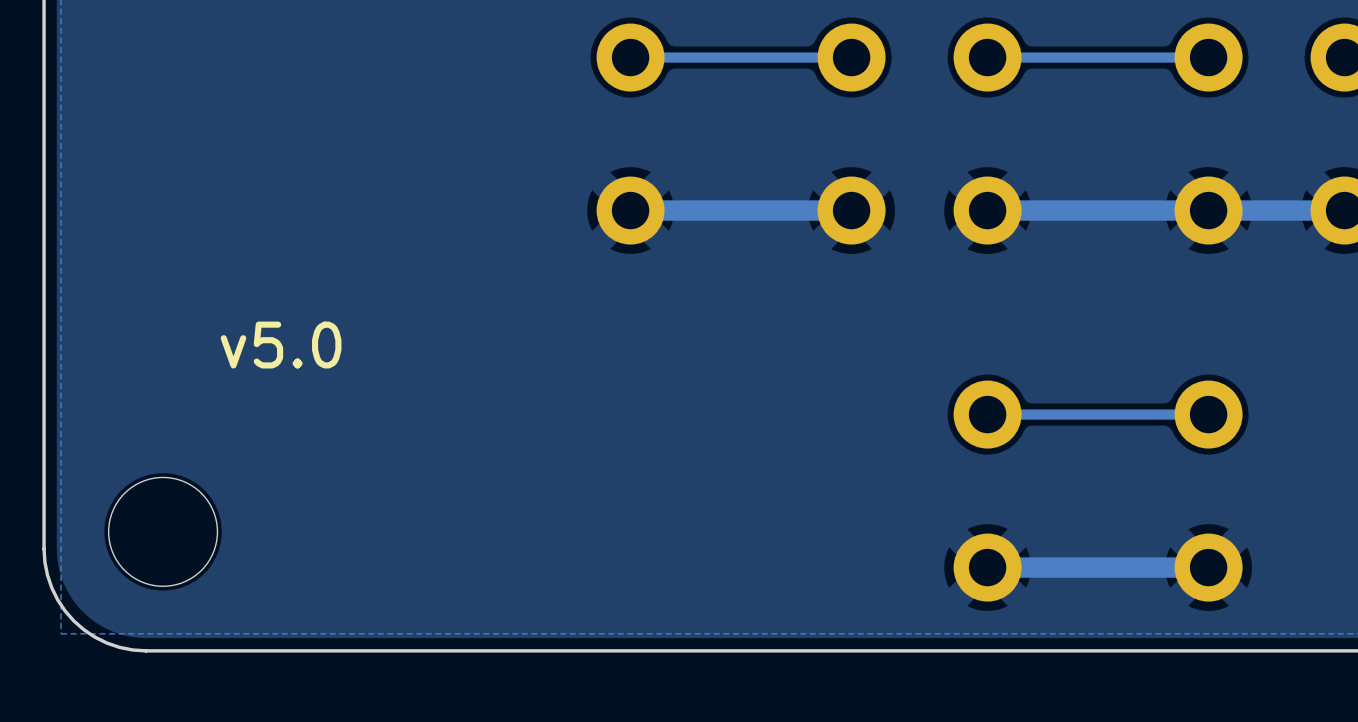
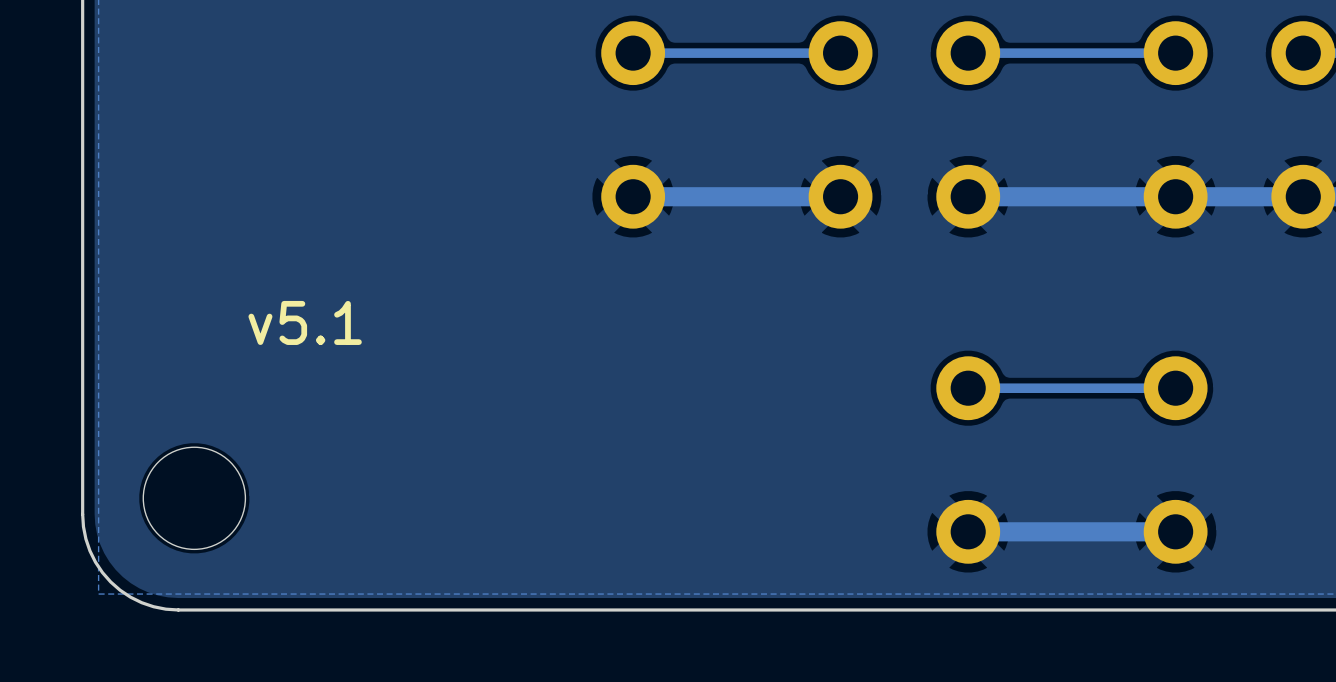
text: v5.0 (281, 345) -> v5.1 (305, 322)

